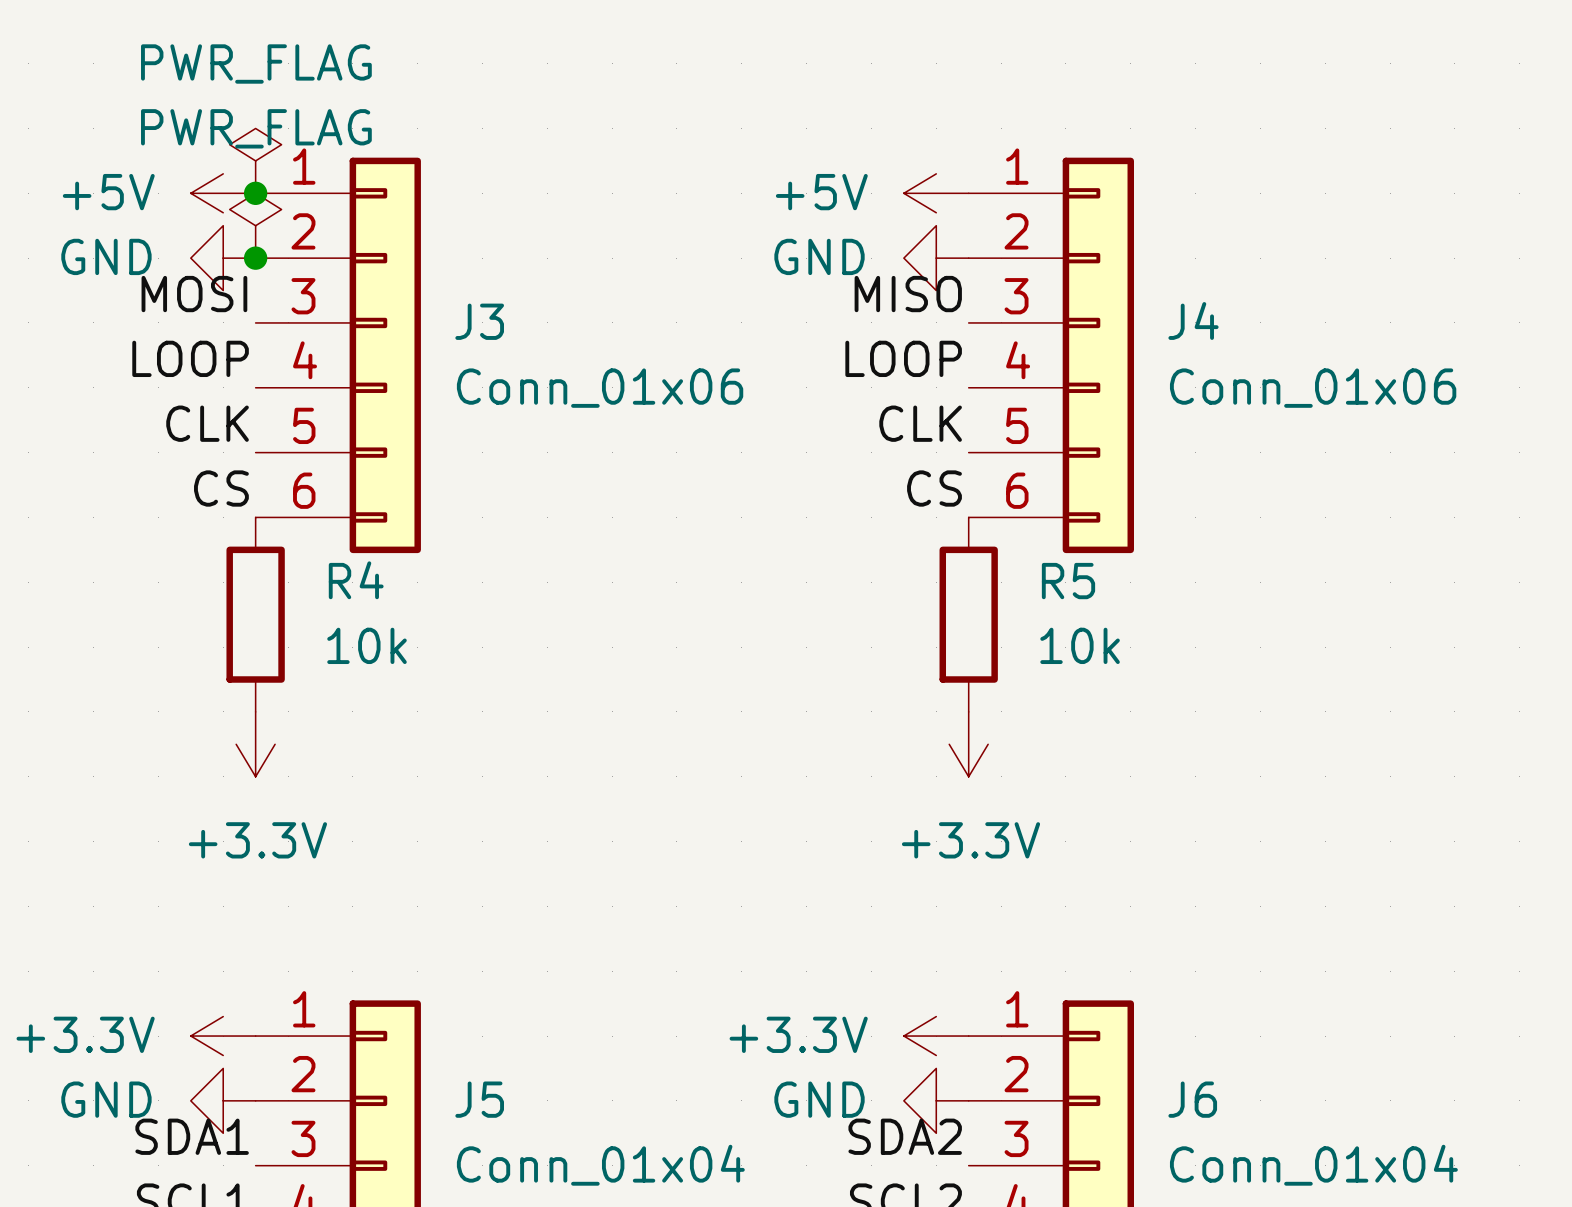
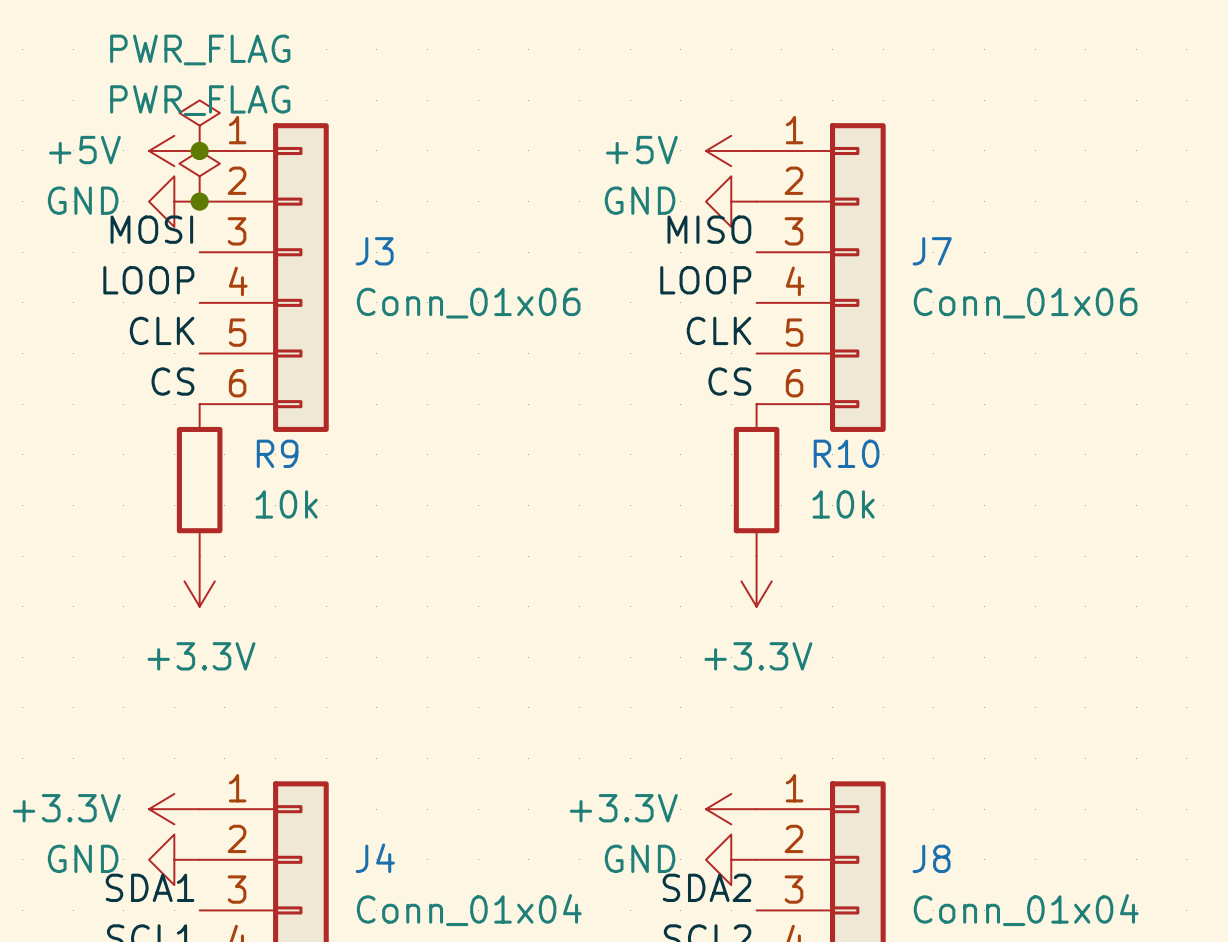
J4 name: J4 (1193, 320) -> J7 (932, 251)
R4 name: R4 (356, 580) -> R9 (277, 453)
R5 name: R5 (1068, 581) -> R10 (846, 453)
J5 name: J5 (479, 1099) -> J4 (375, 858)
J6 name: J6 (1192, 1099) -> J8 (931, 858)

